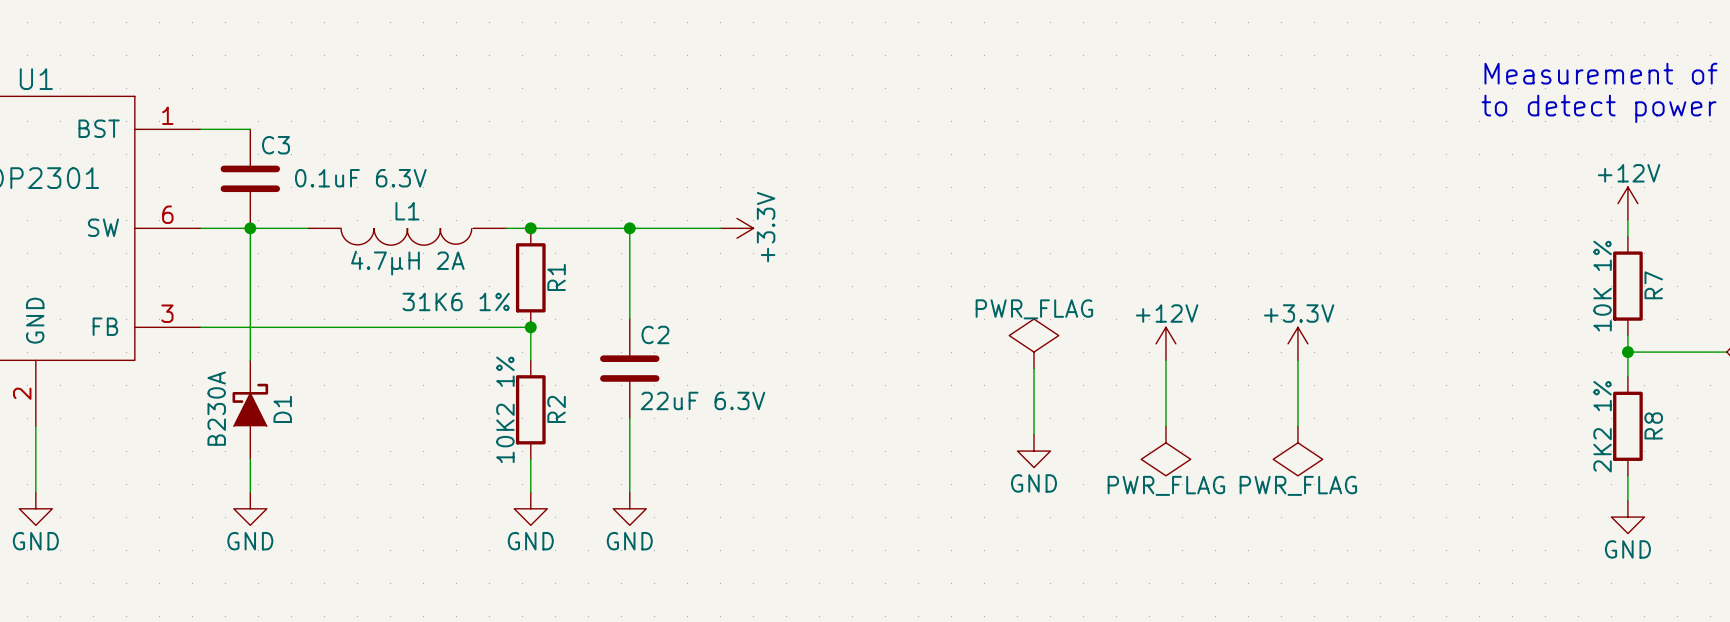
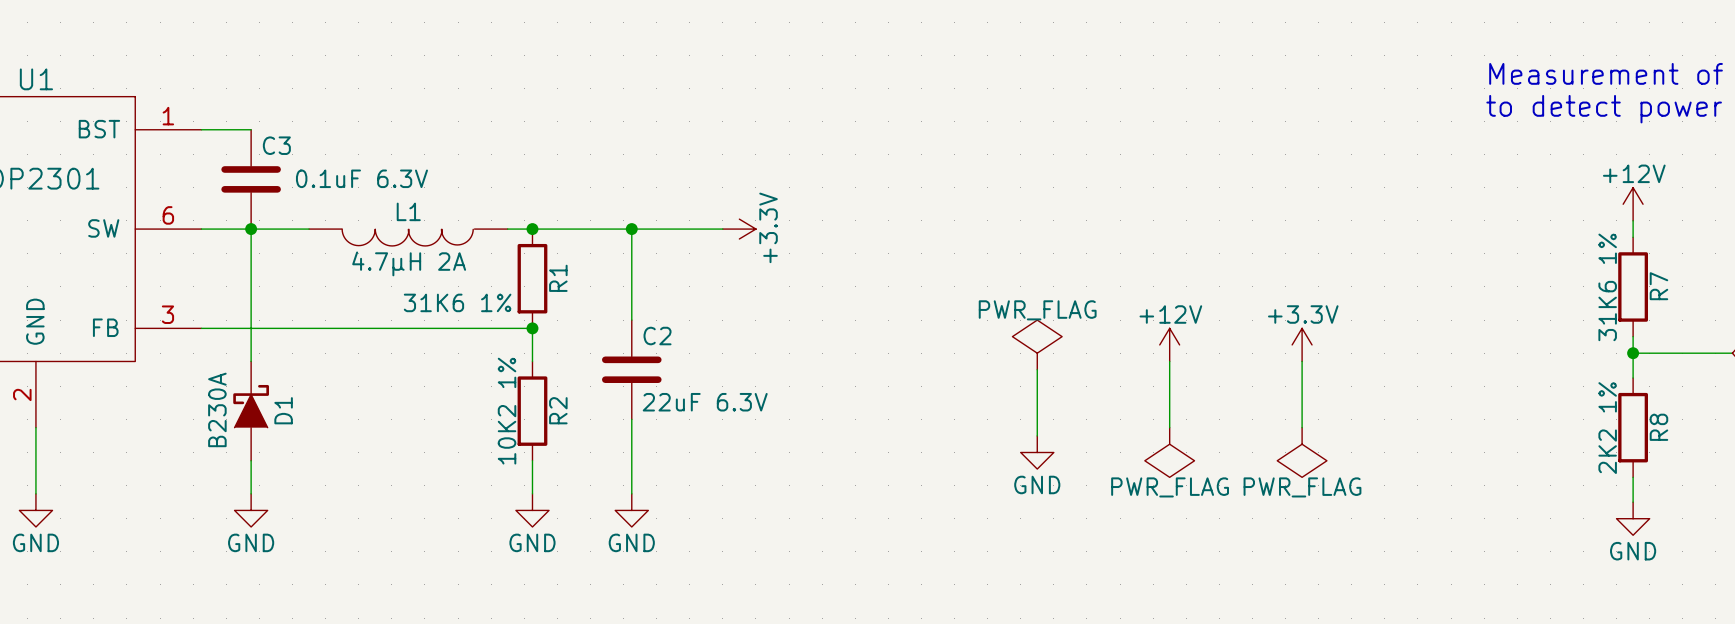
R7 value: 10K 1% (1602, 286) -> 31K6 1% (1607, 287)

